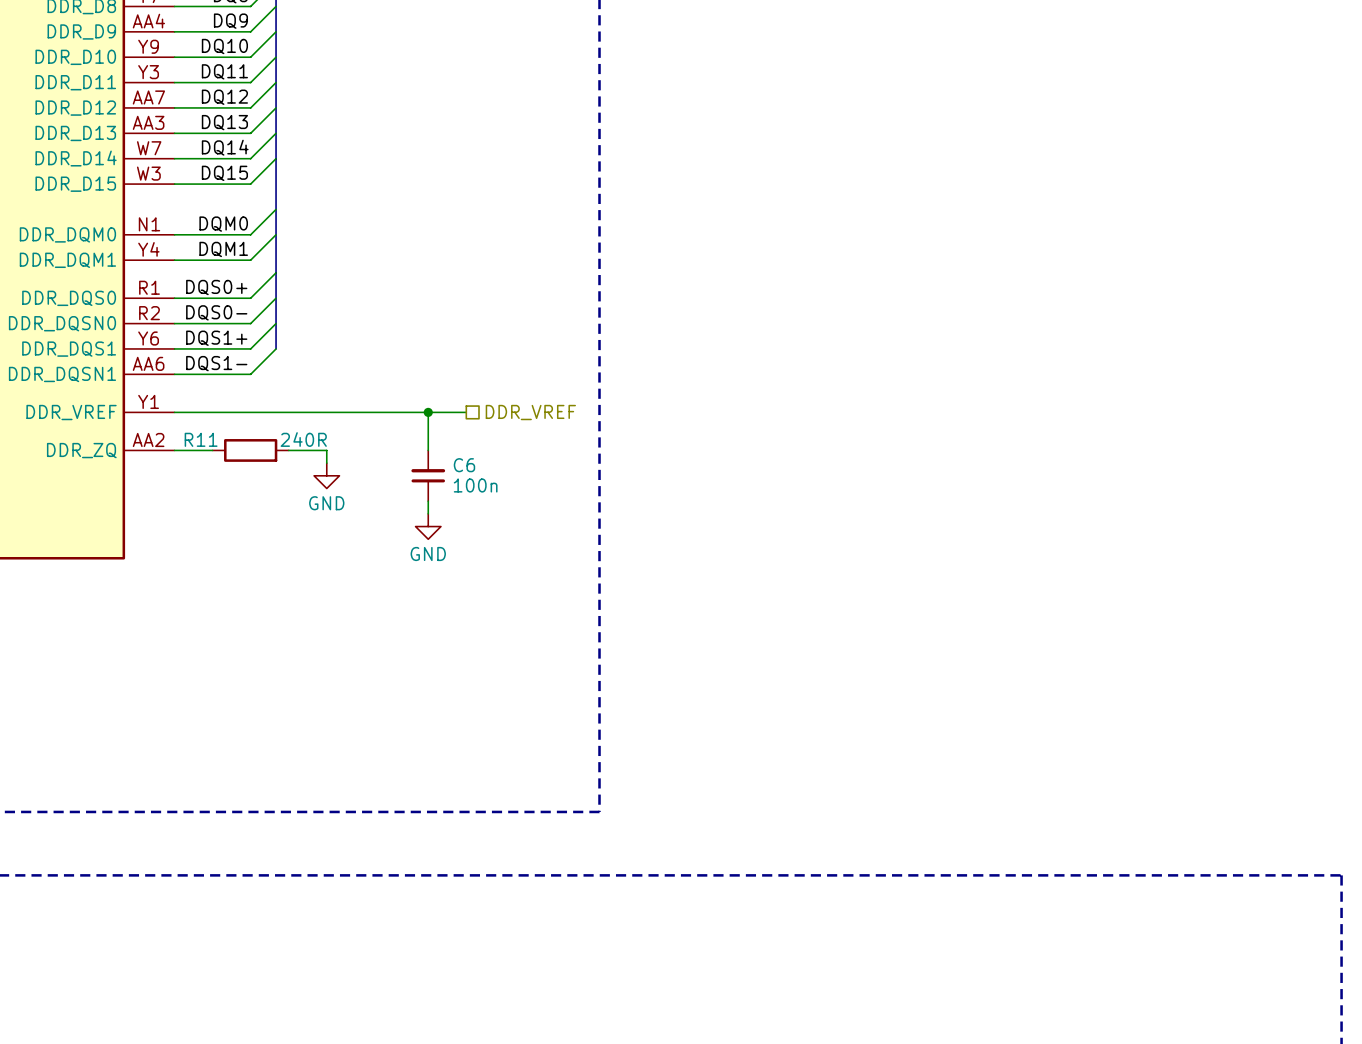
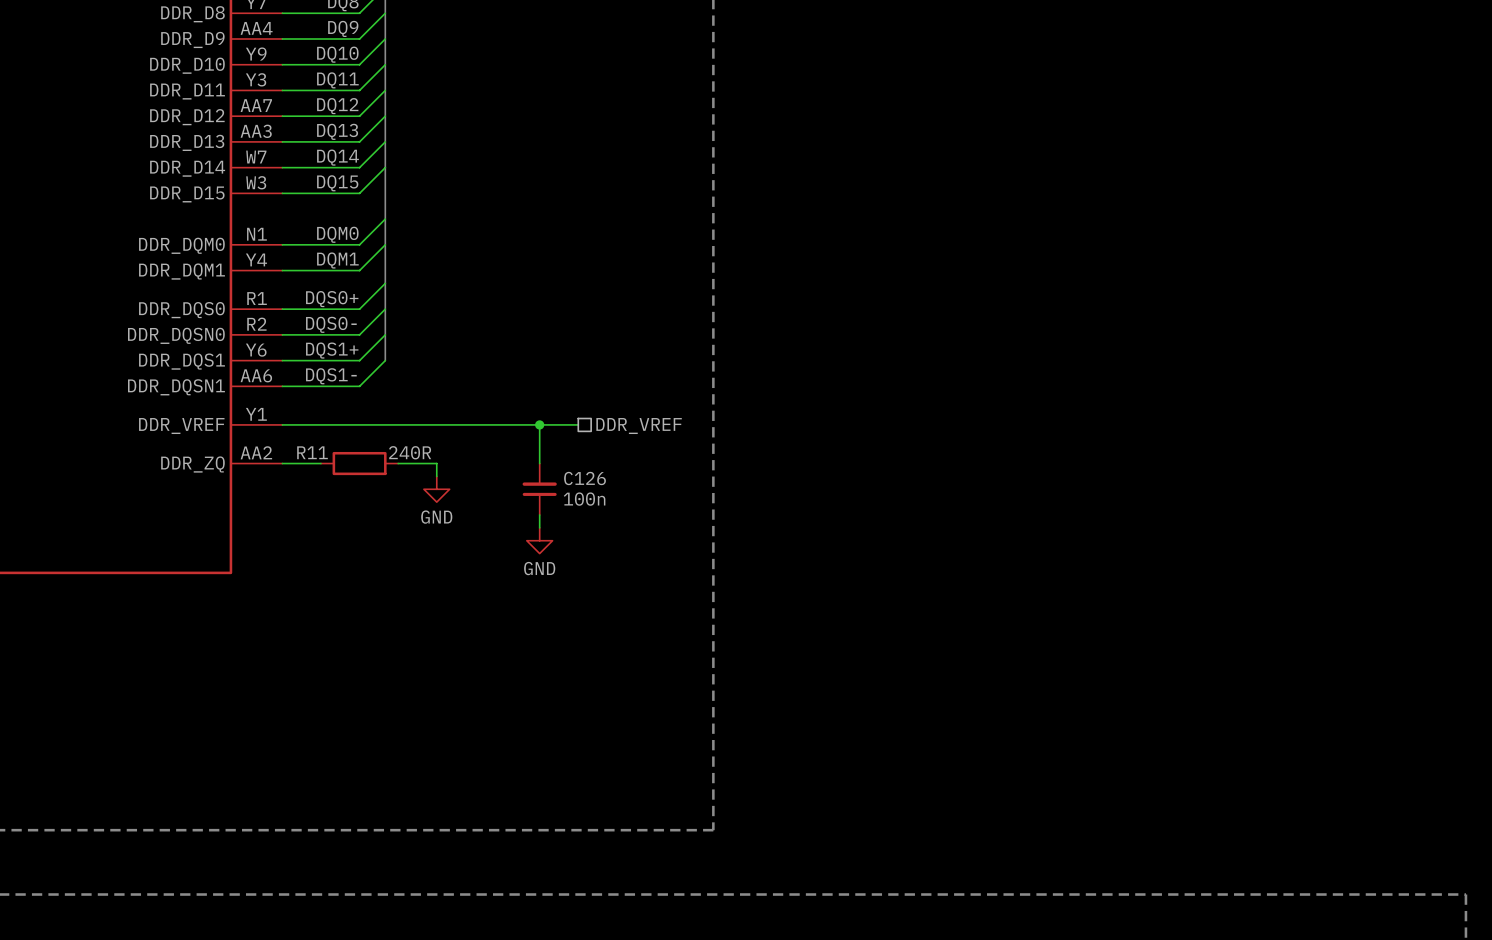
C6 name: C6 (464, 465) -> C126 (585, 478)

